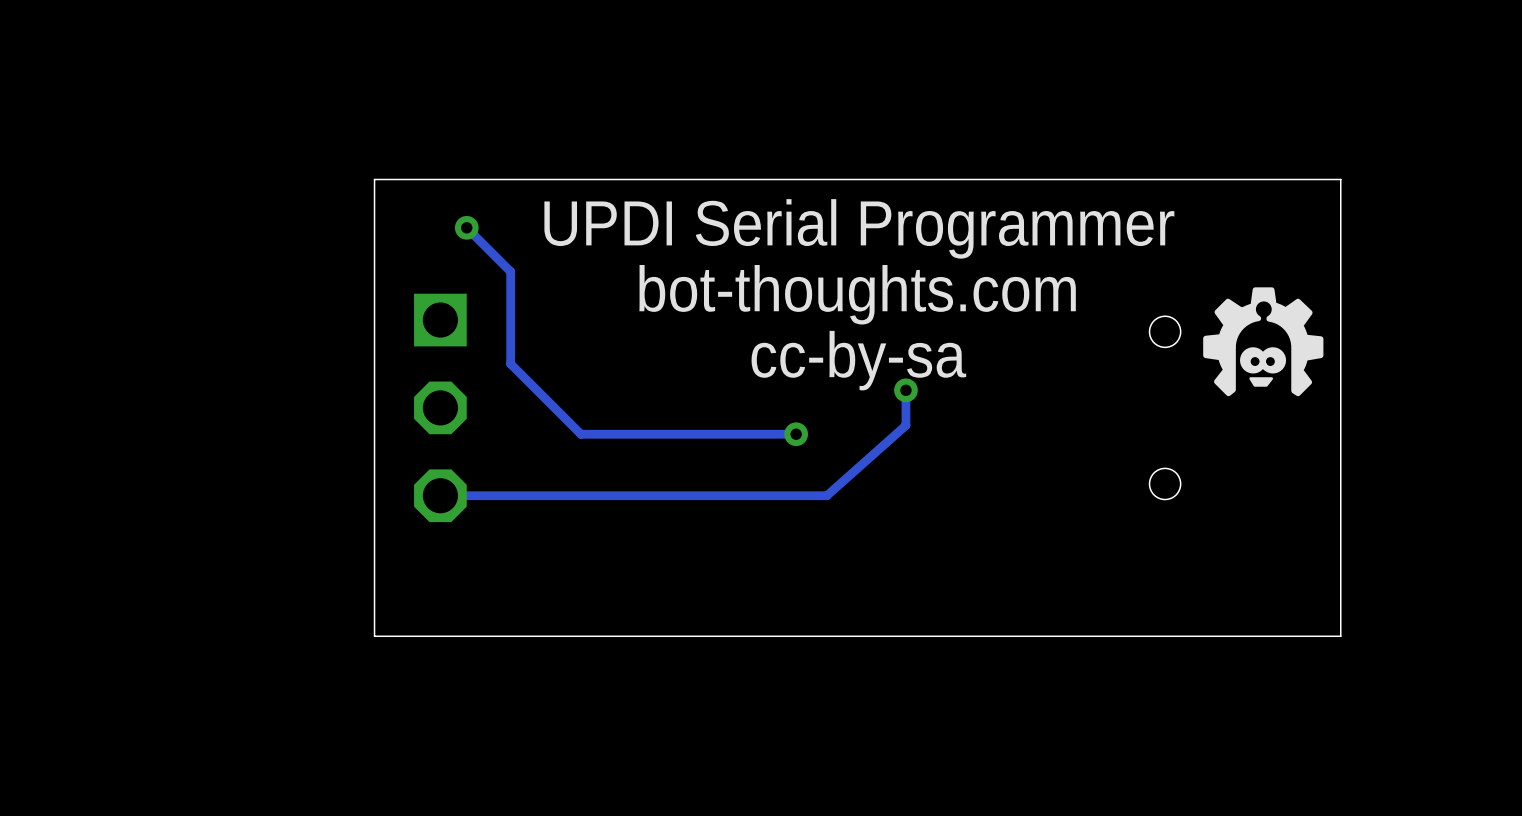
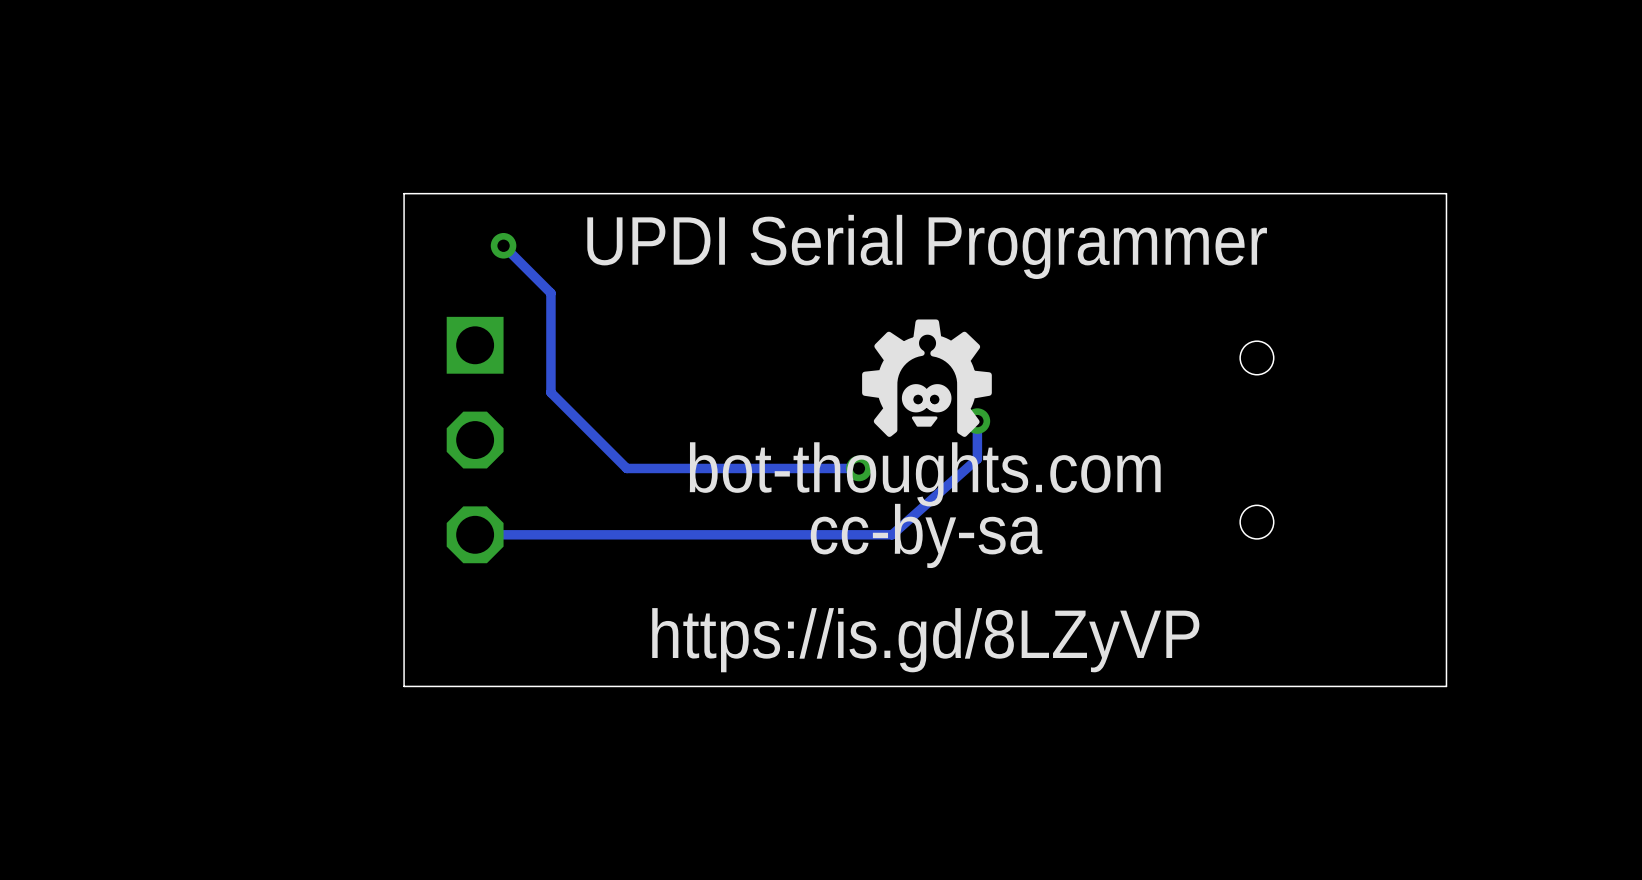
text position: bot-thoughts.com (857, 294) -> bot-thoughts.com (925, 474)
drawing position: (1263, 341) -> (926, 378)
text position: cc-by-sa (858, 360) -> cc-by-sa (926, 535)
text: none -> https://is.gd/8LZyVP (925, 640)

